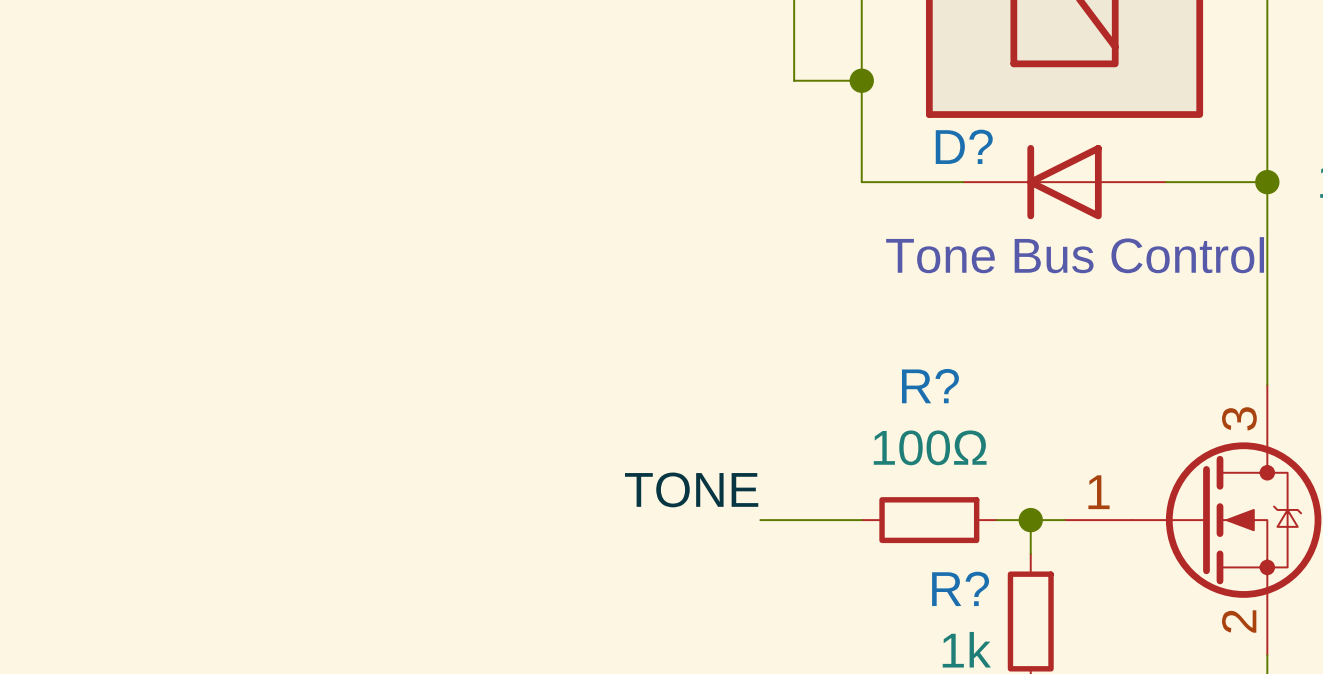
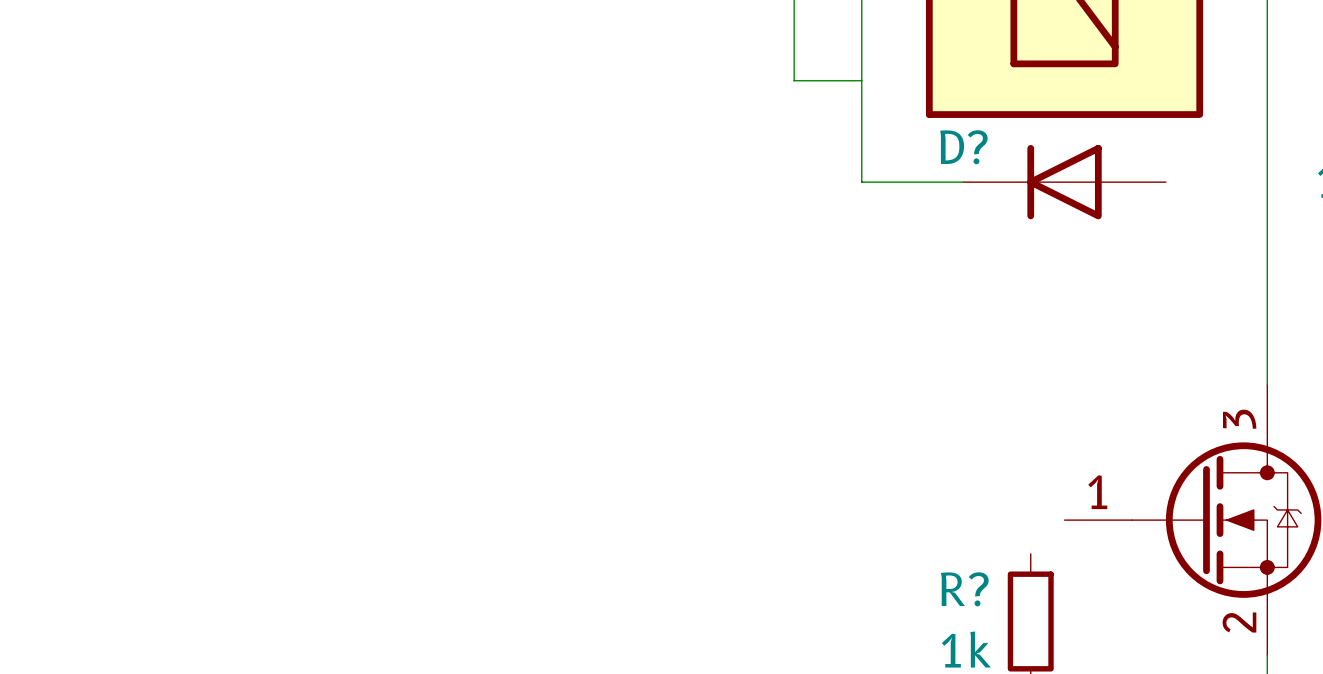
junction: (861, 80) -> none
wire: (1165, 182) (1267, 182) -> none
junction: (1267, 182) -> none
text: Tone Bus Control (1075, 255) -> none
label: TONE (691, 489) -> none
wire: (760, 520) (861, 520) -> none
R?: 100Ω (929, 520) -> none
wire: (996, 520) (1064, 520) -> none
wire: (1030, 520) (1030, 553) -> none
junction: (1030, 520) -> none

